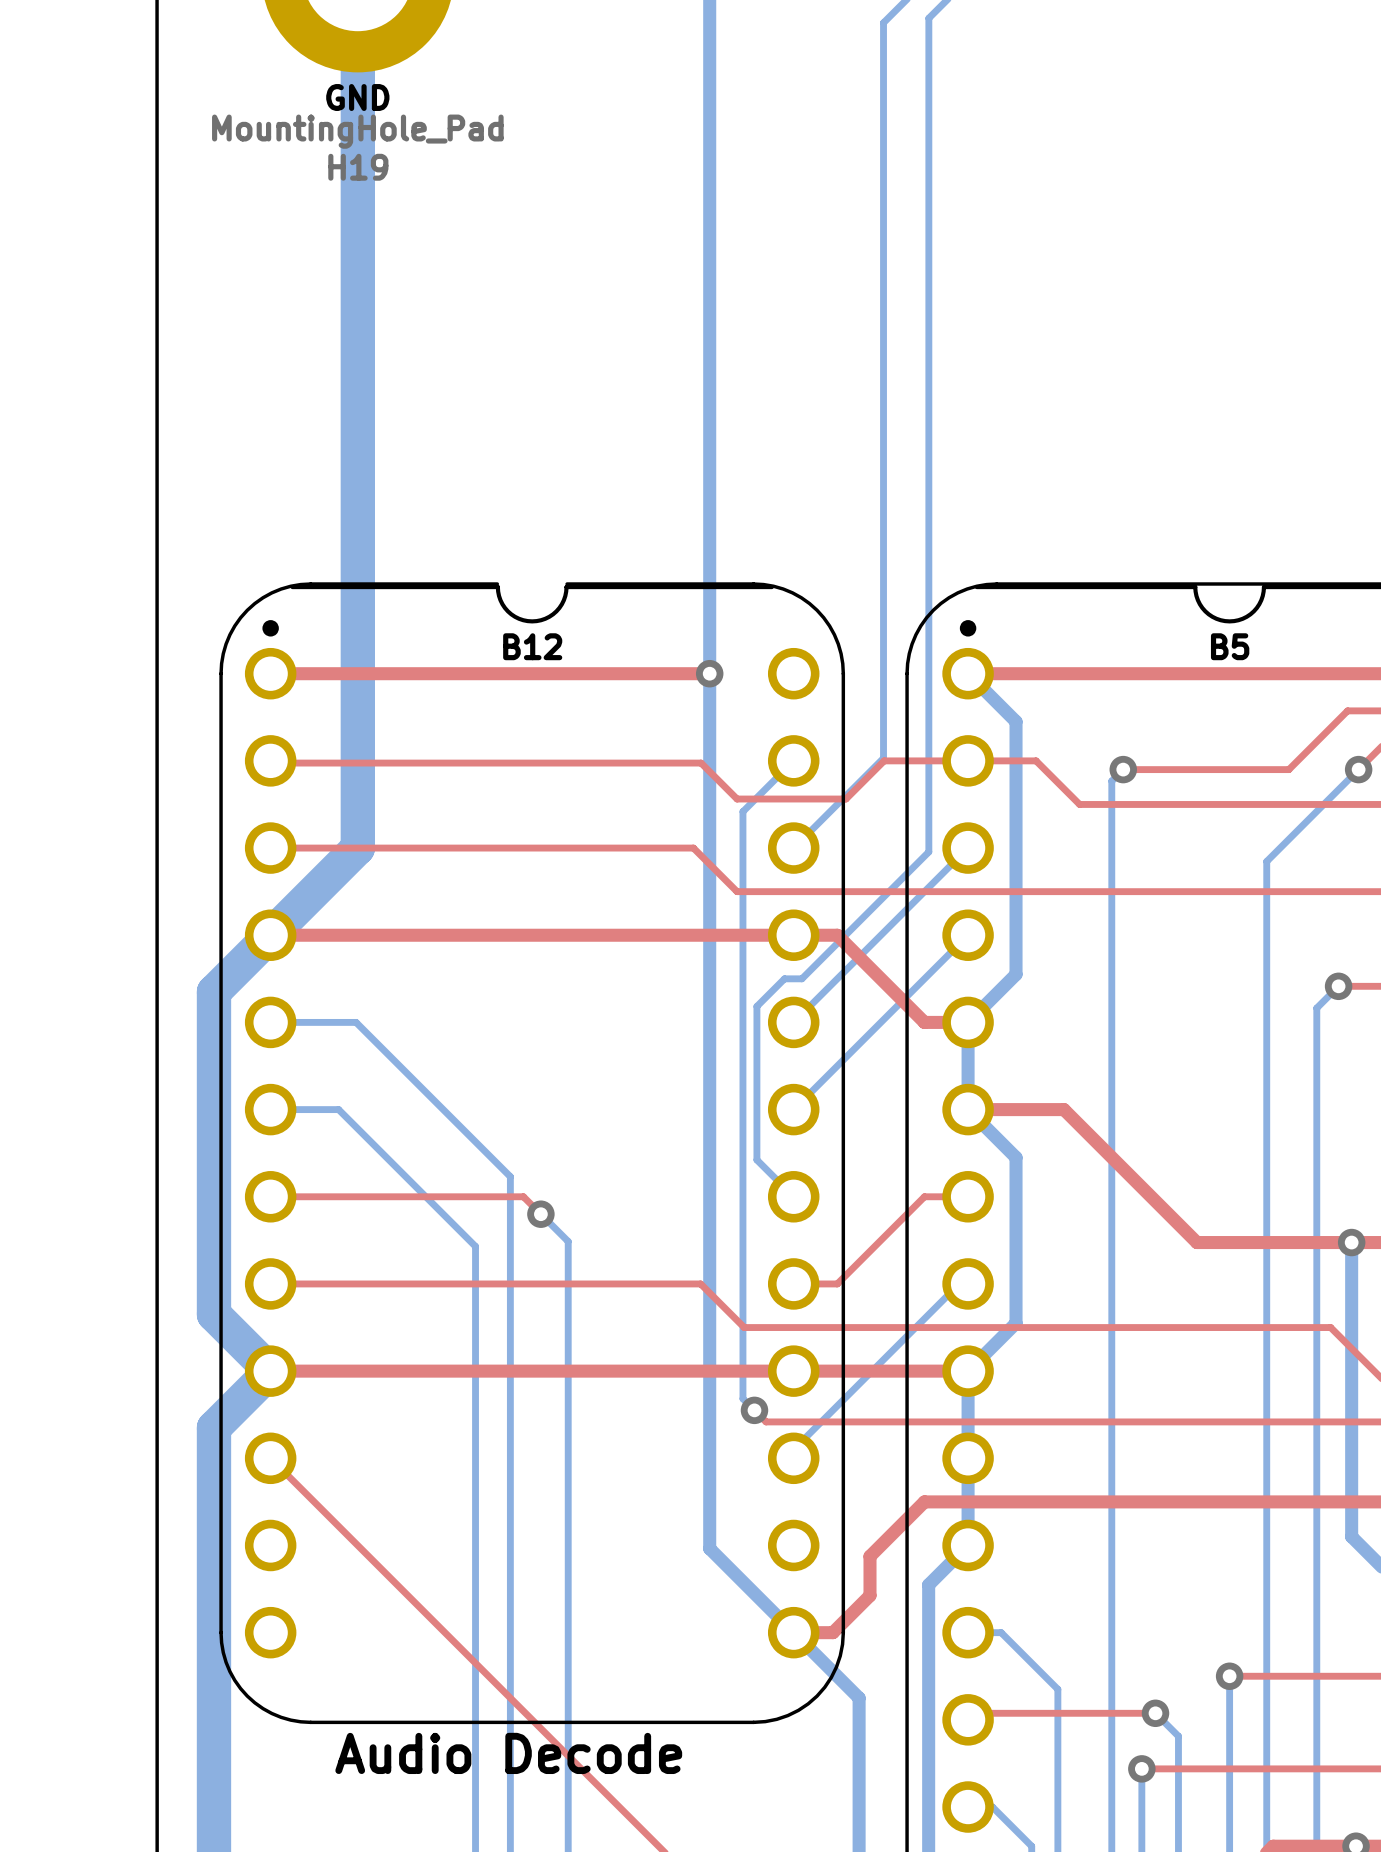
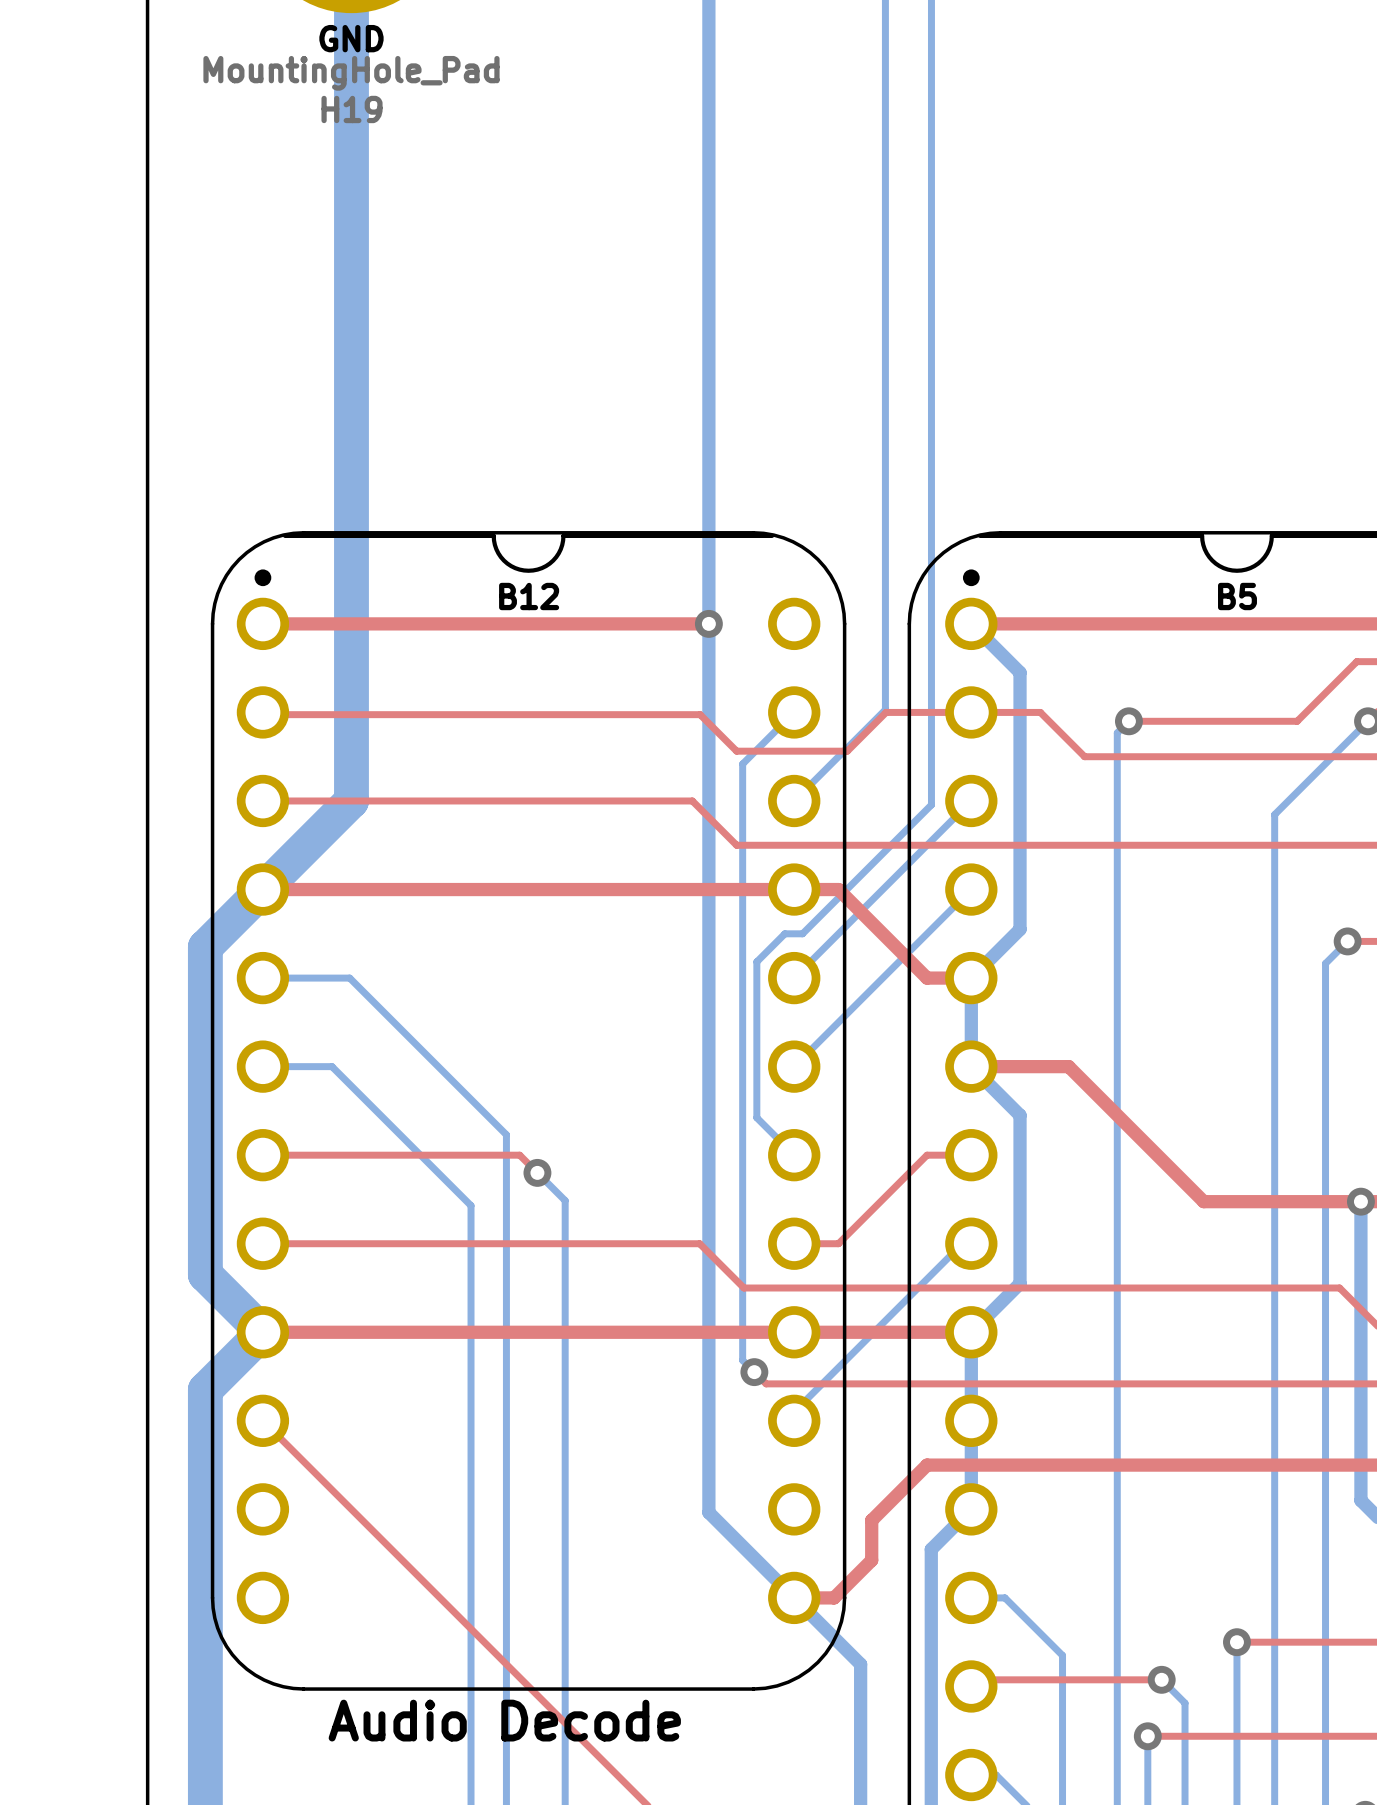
B12 footprint: [219, 582, 846, 1725] -> [210, 531, 847, 1691]

